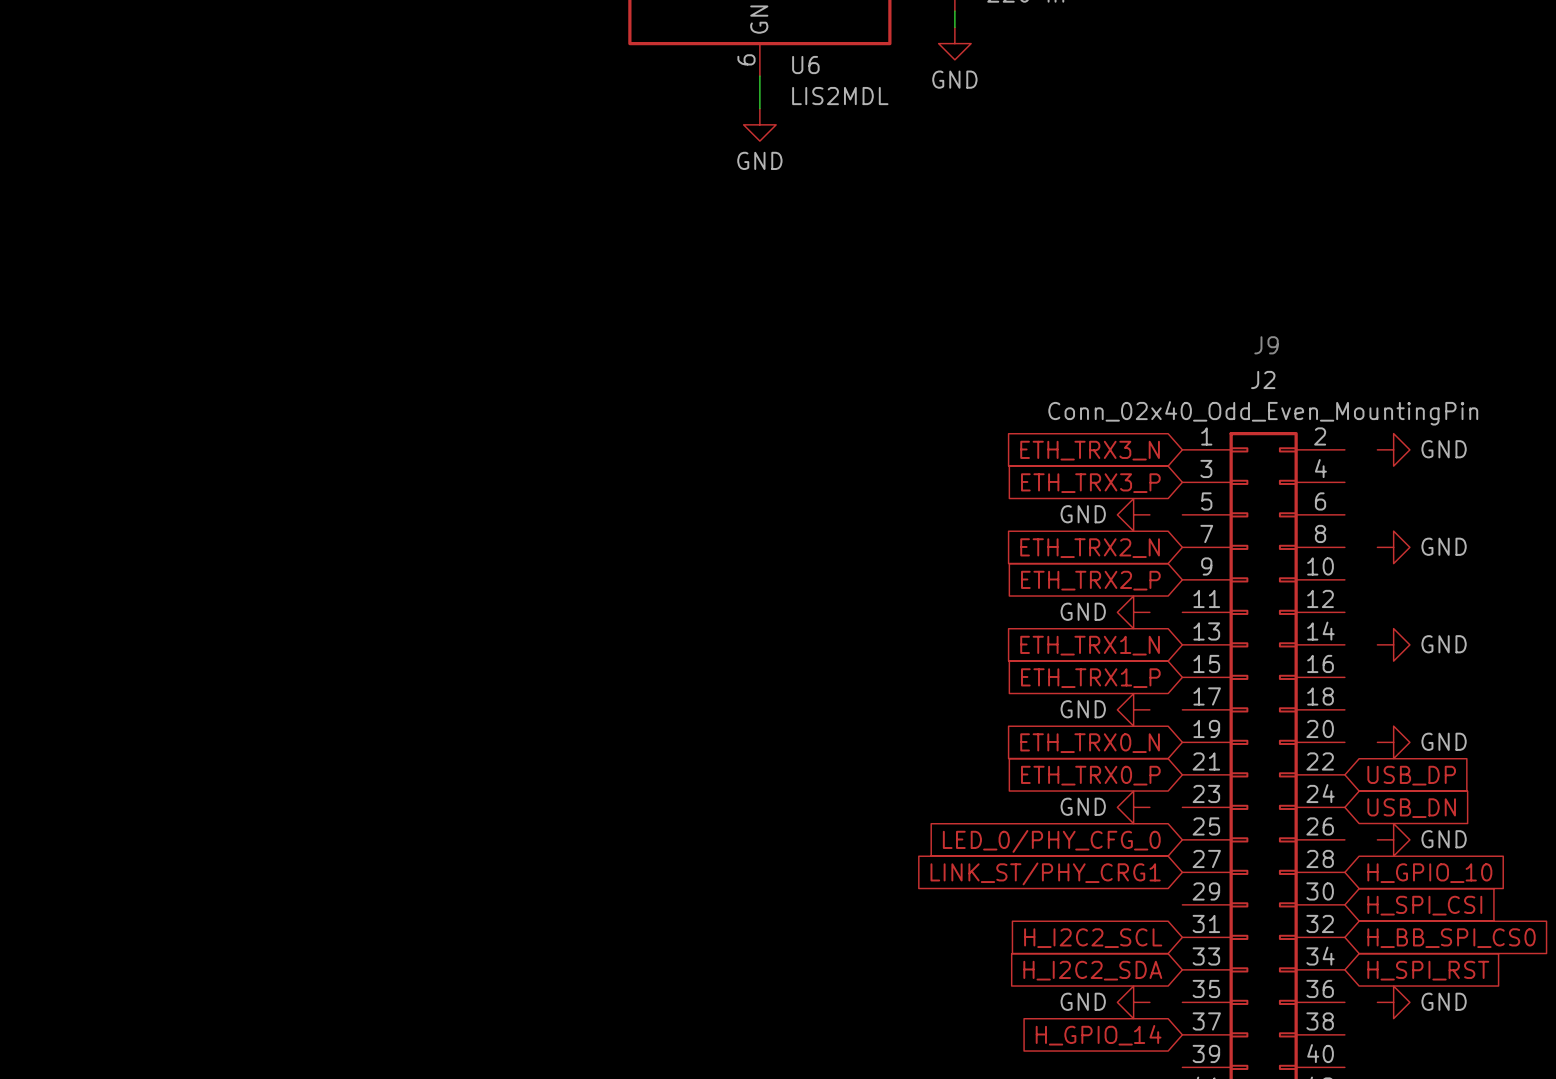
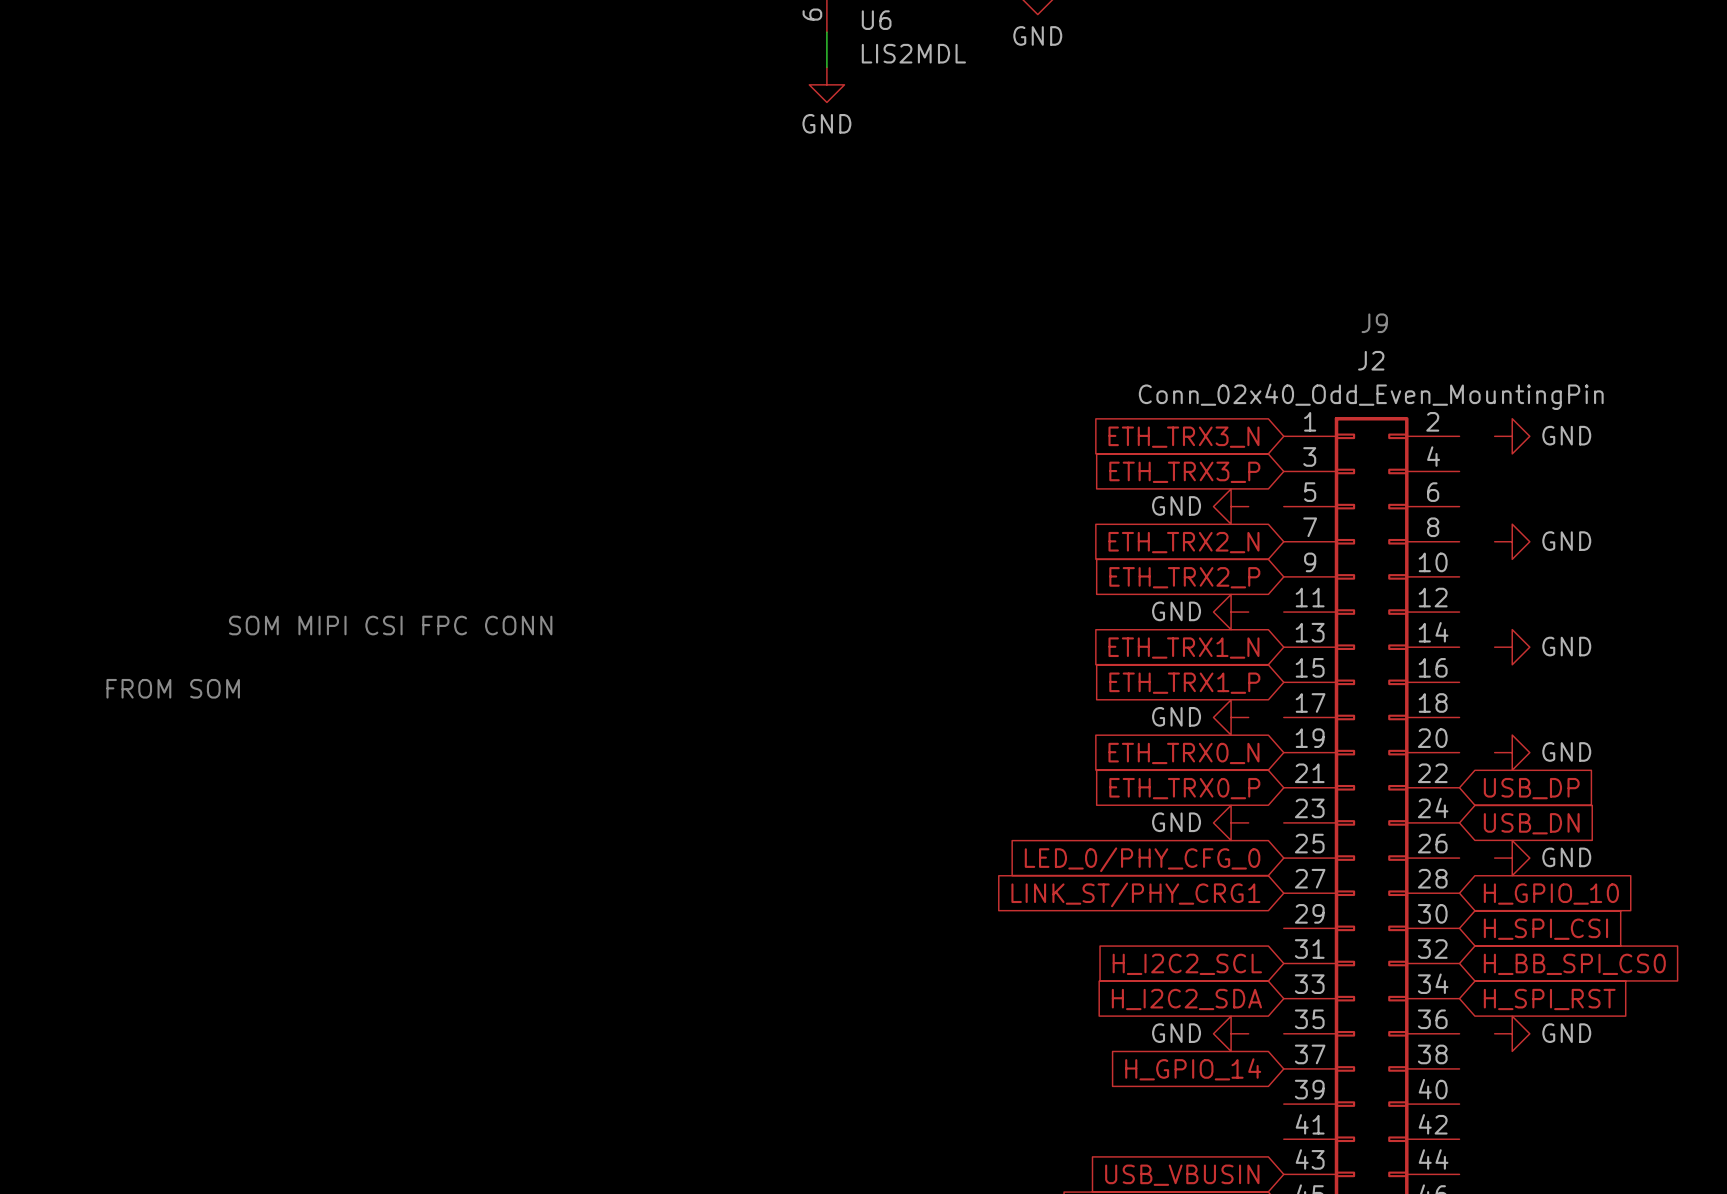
text: none -> SOM MIPI CSI FPC CONN (390, 625)
text: none -> FROM SOM (173, 688)

